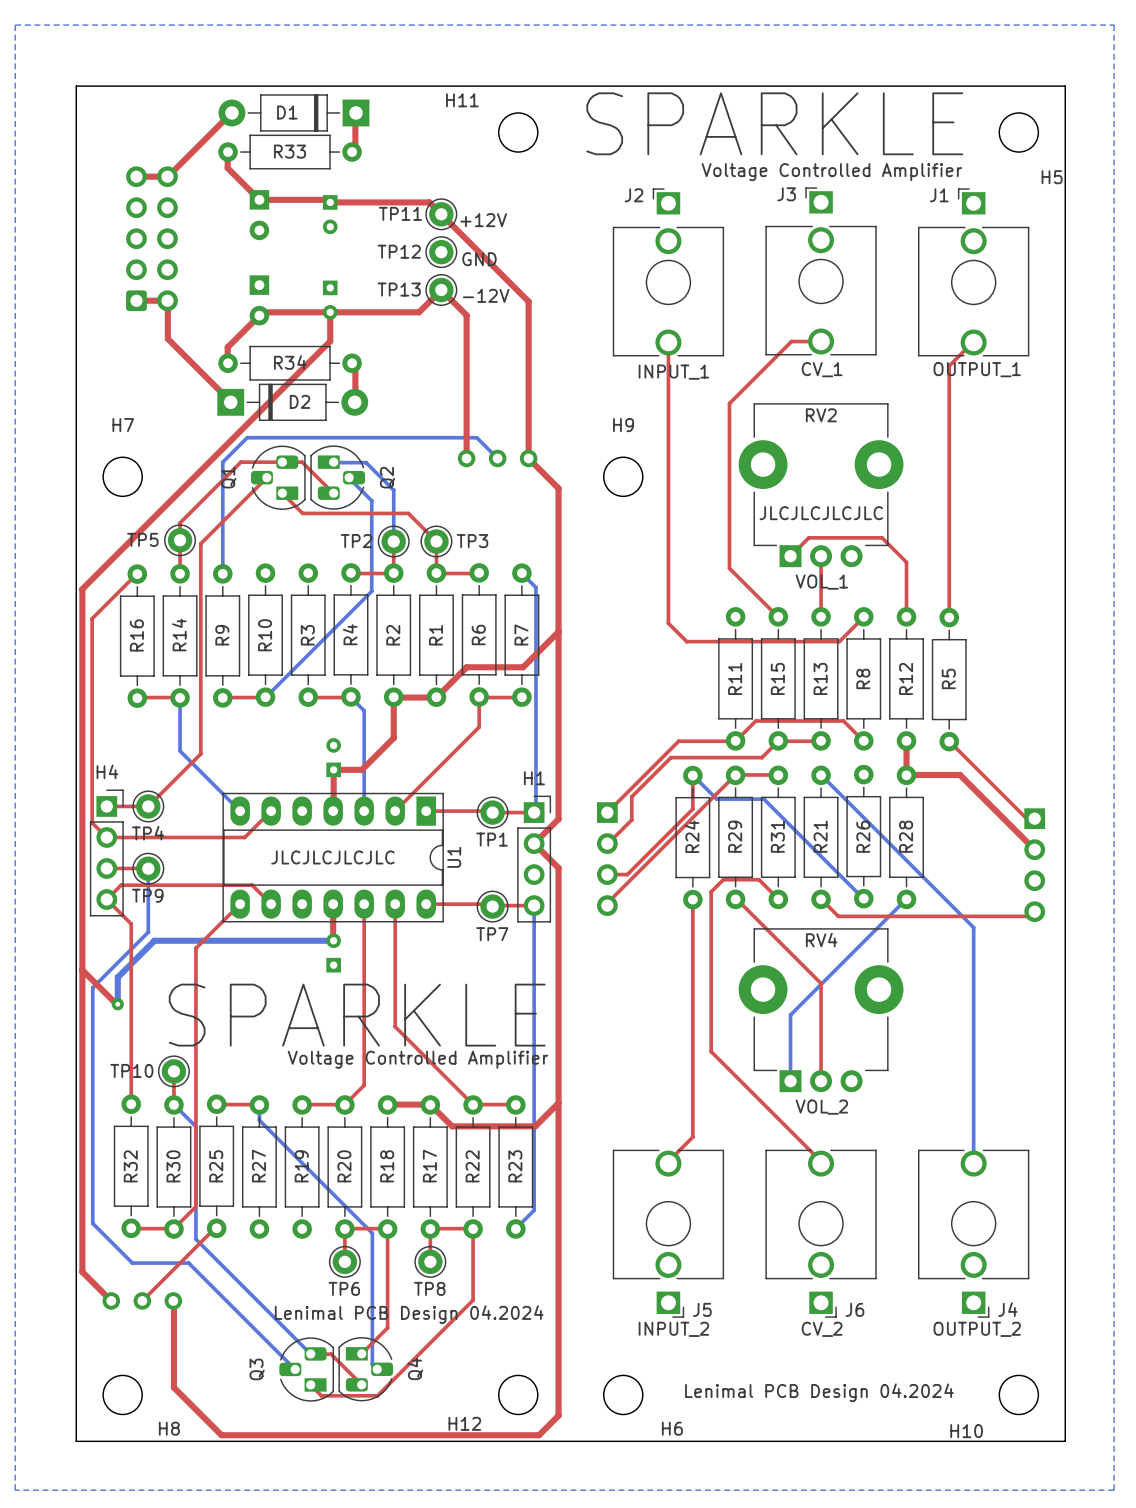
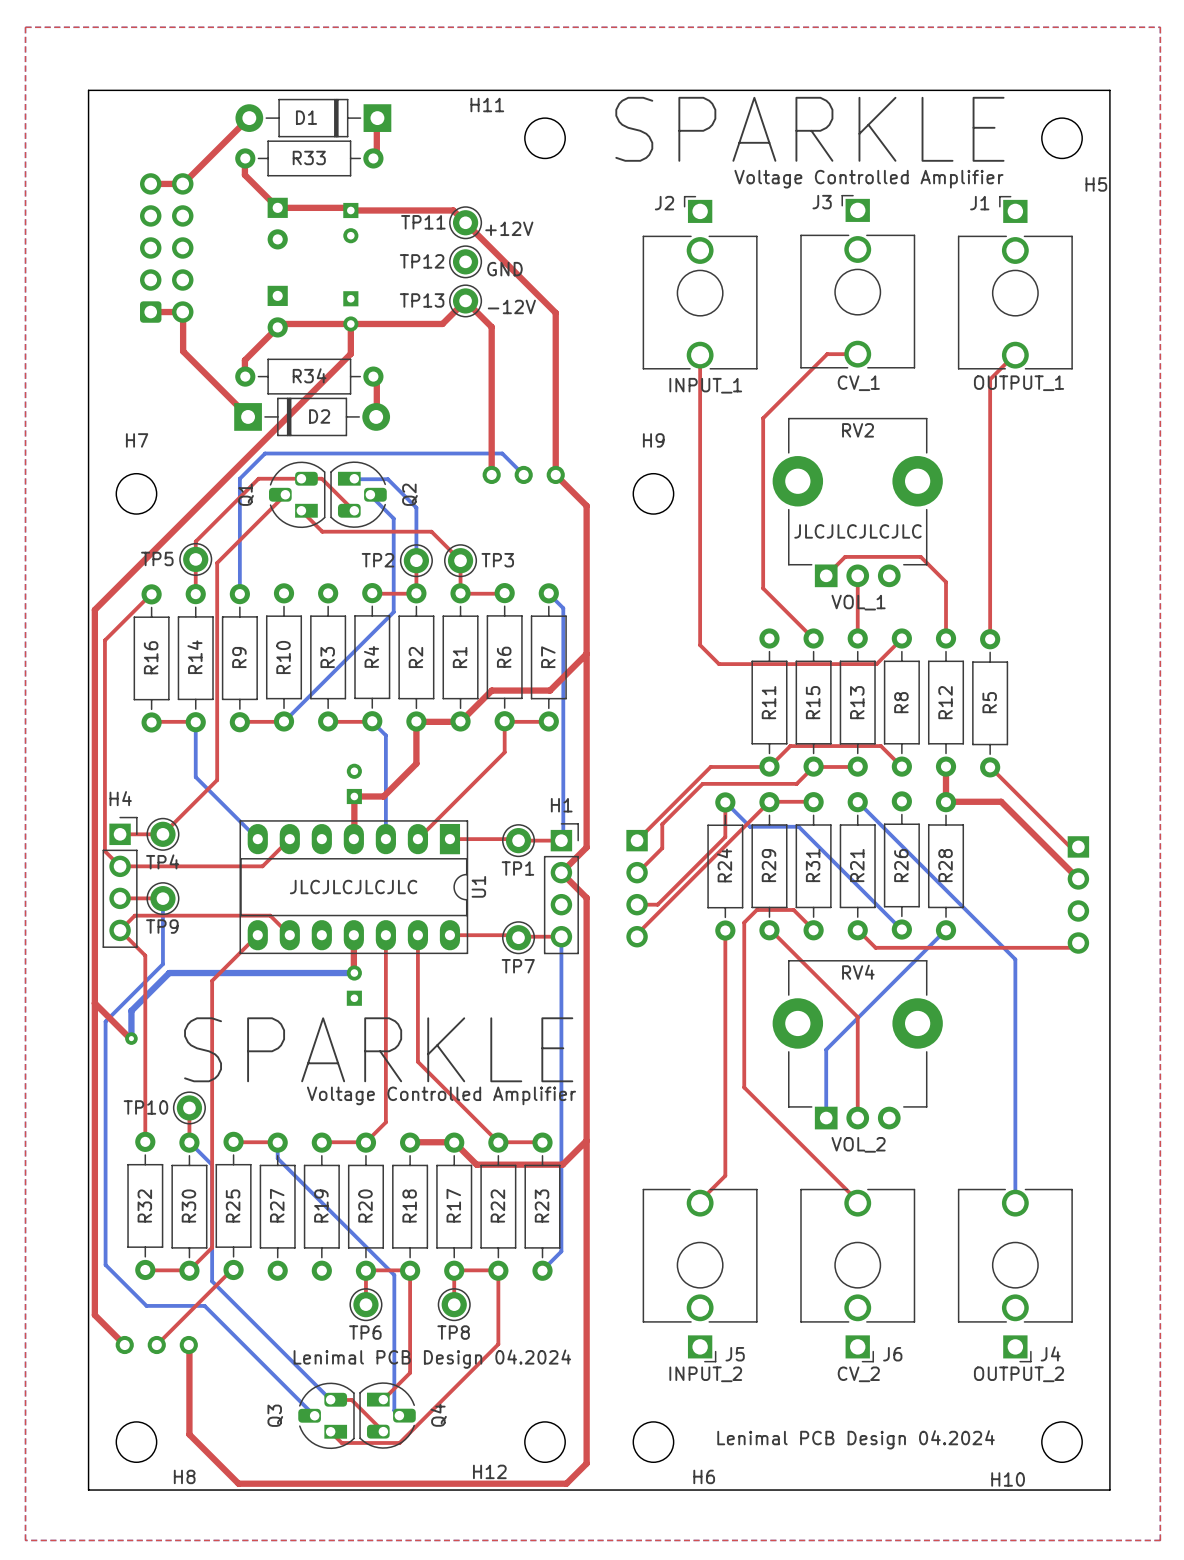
top zone outline: none -> (25, 27) (1160, 27) (1160, 1540) (25, 1540) (25, 27)

